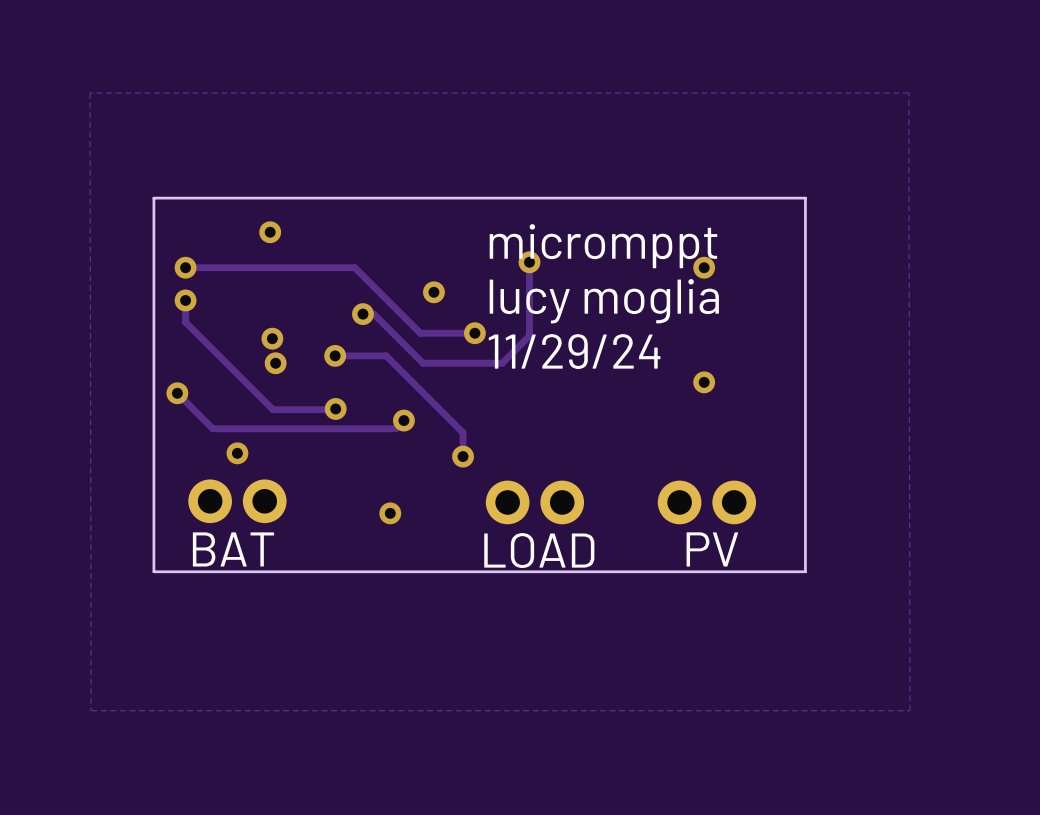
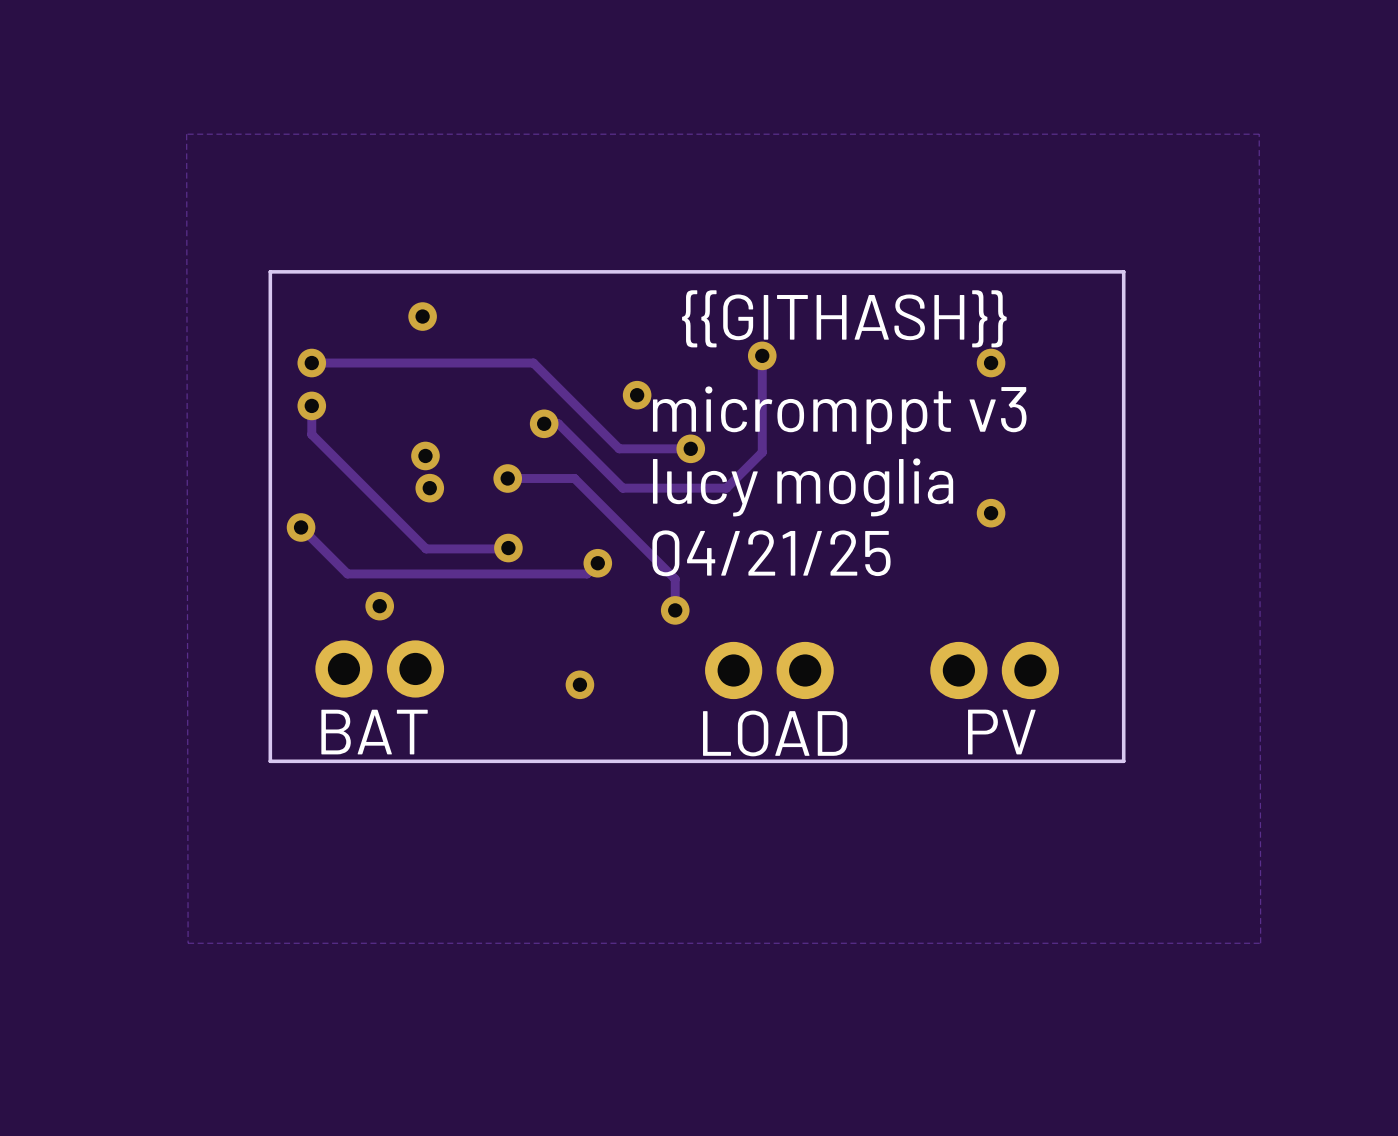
text: micromppt (603, 246) -> {{GITHASH}} (844, 318)
text position: lucy moglia (604, 301) -> lucy moglia (803, 487)
text: none -> micromppt v3 (839, 415)
text: 11/29/24 (574, 351) -> none
text: none -> 04/21/25 (771, 553)

